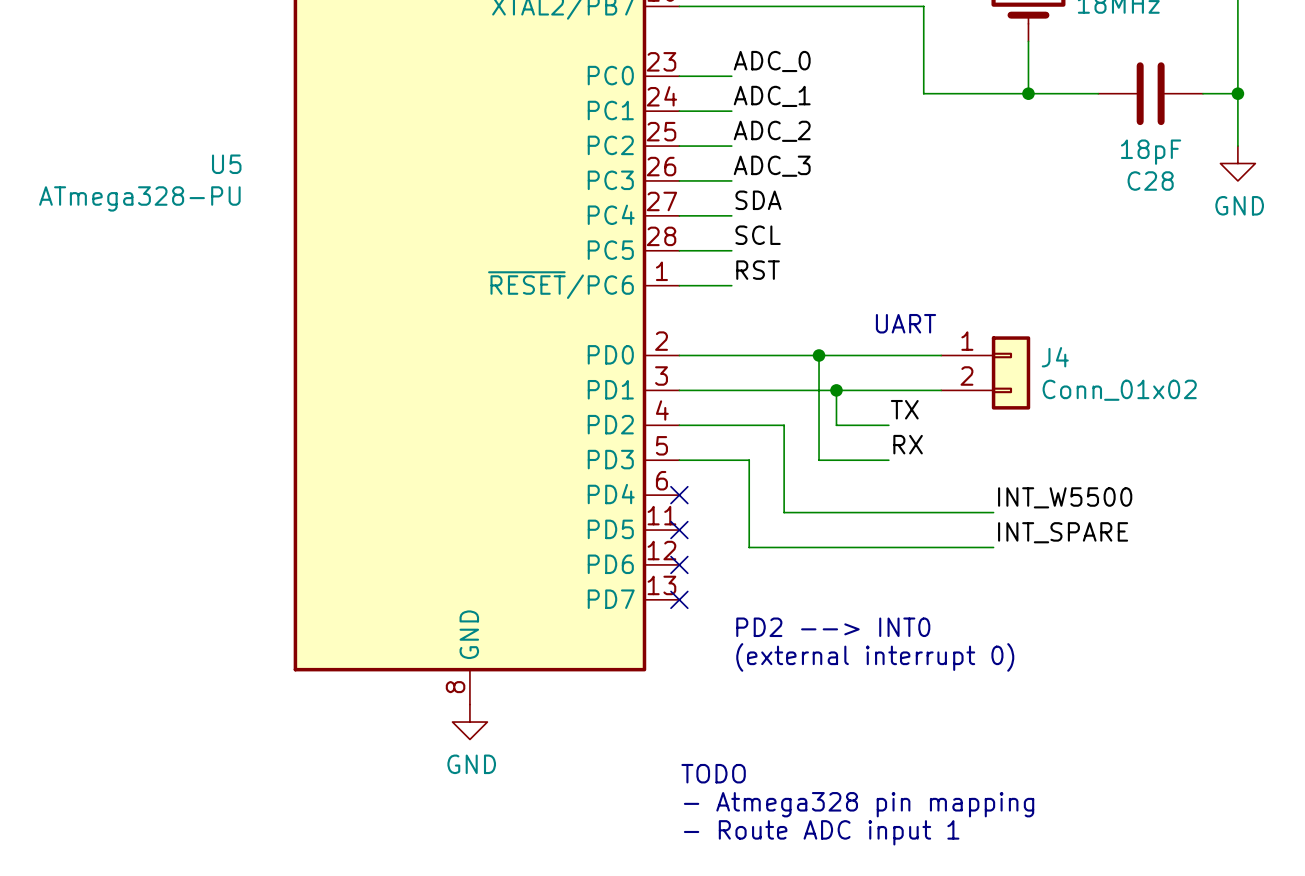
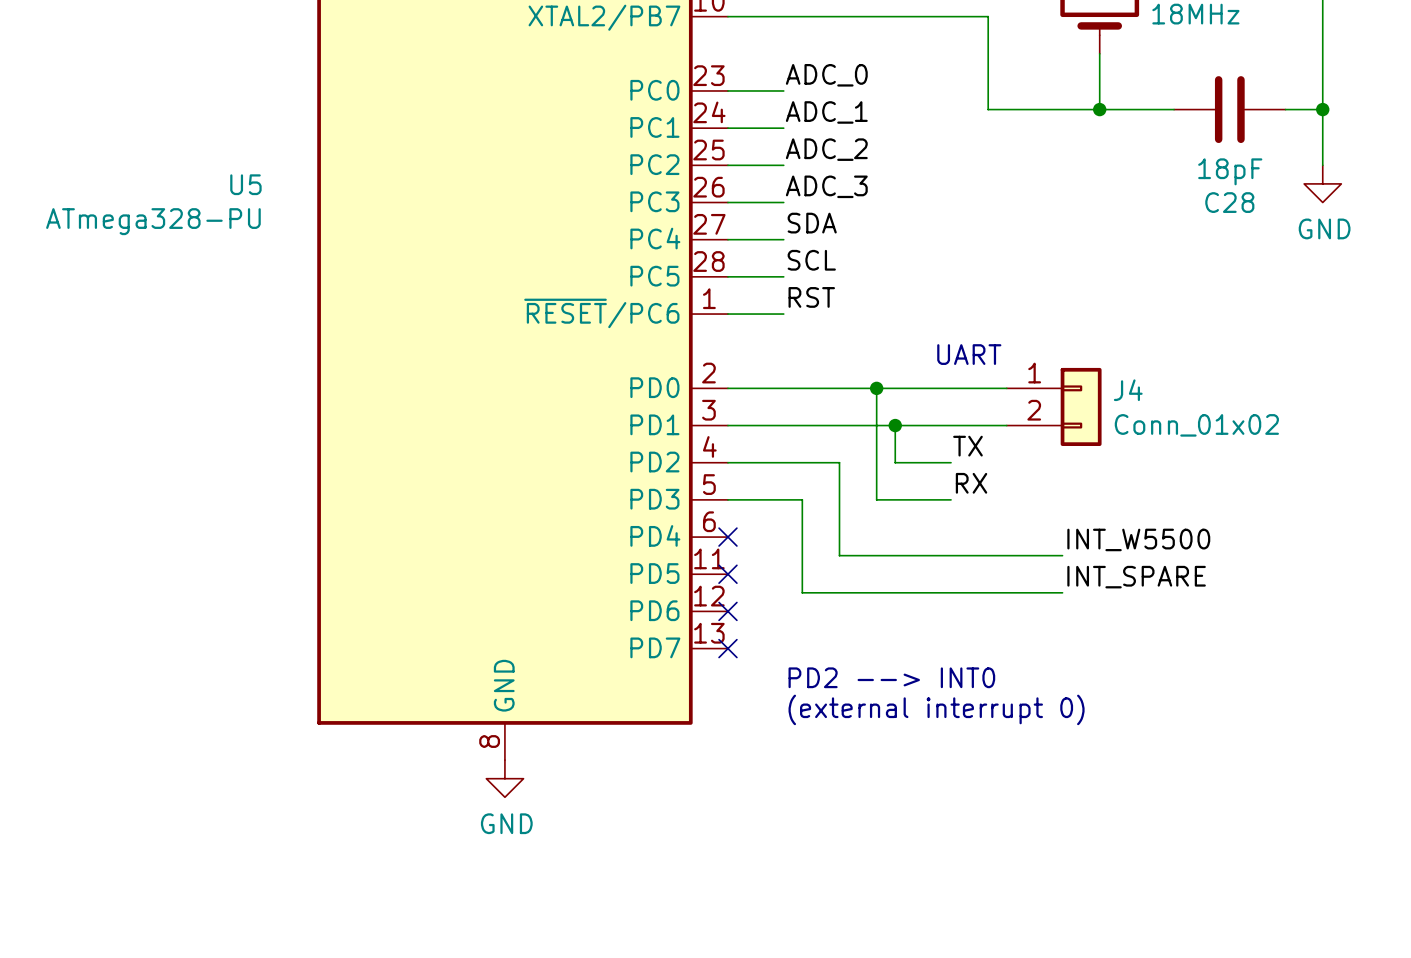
text: TODO (713, 773) -> none
text: - Atmega328 pin mapping (859, 804) -> none
text: - Route ADC input 1 (821, 832) -> none

